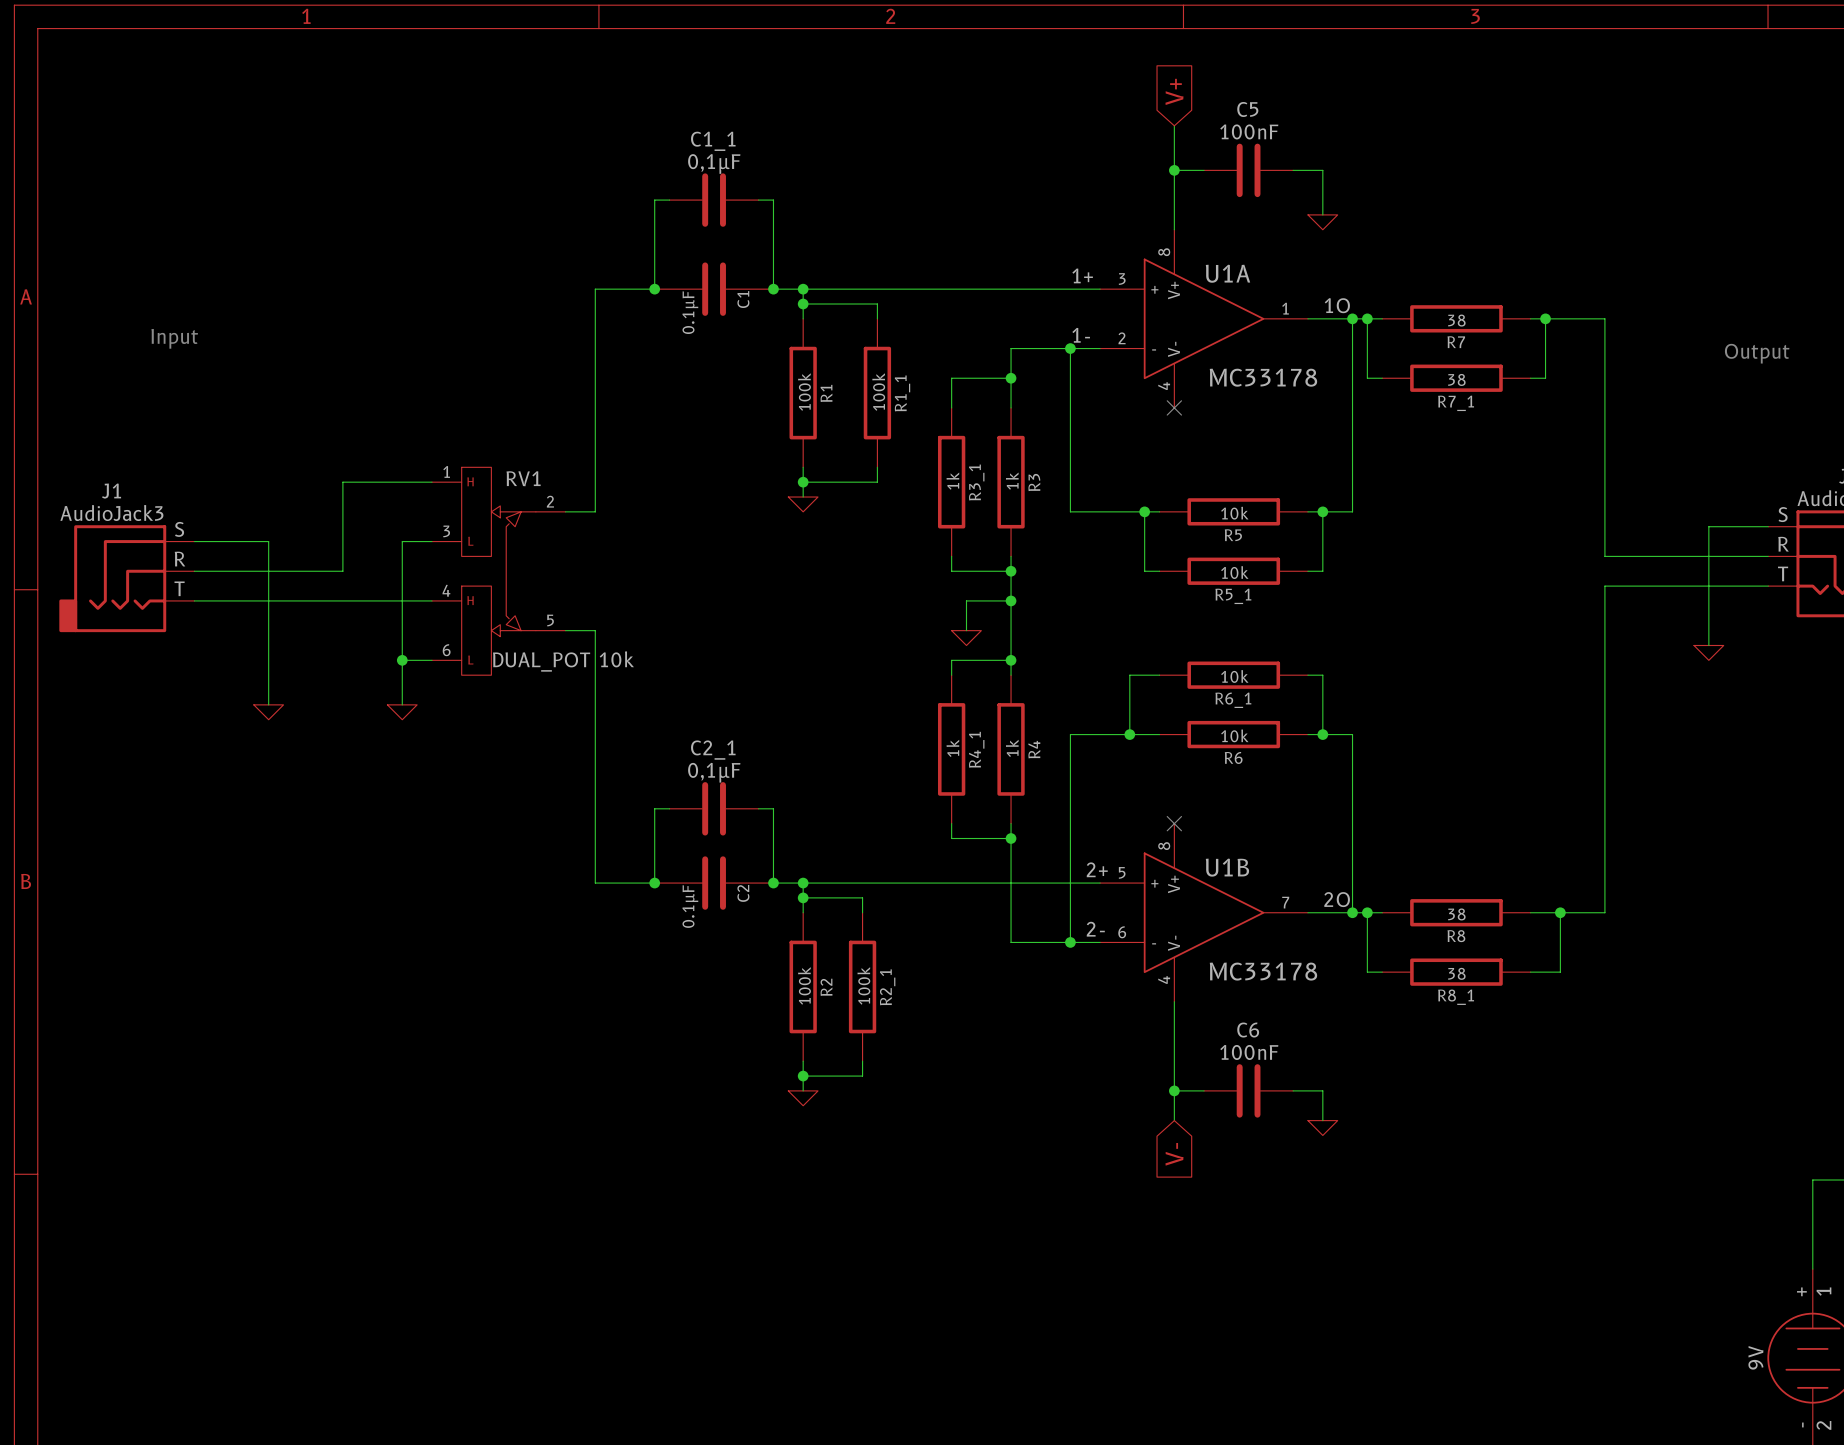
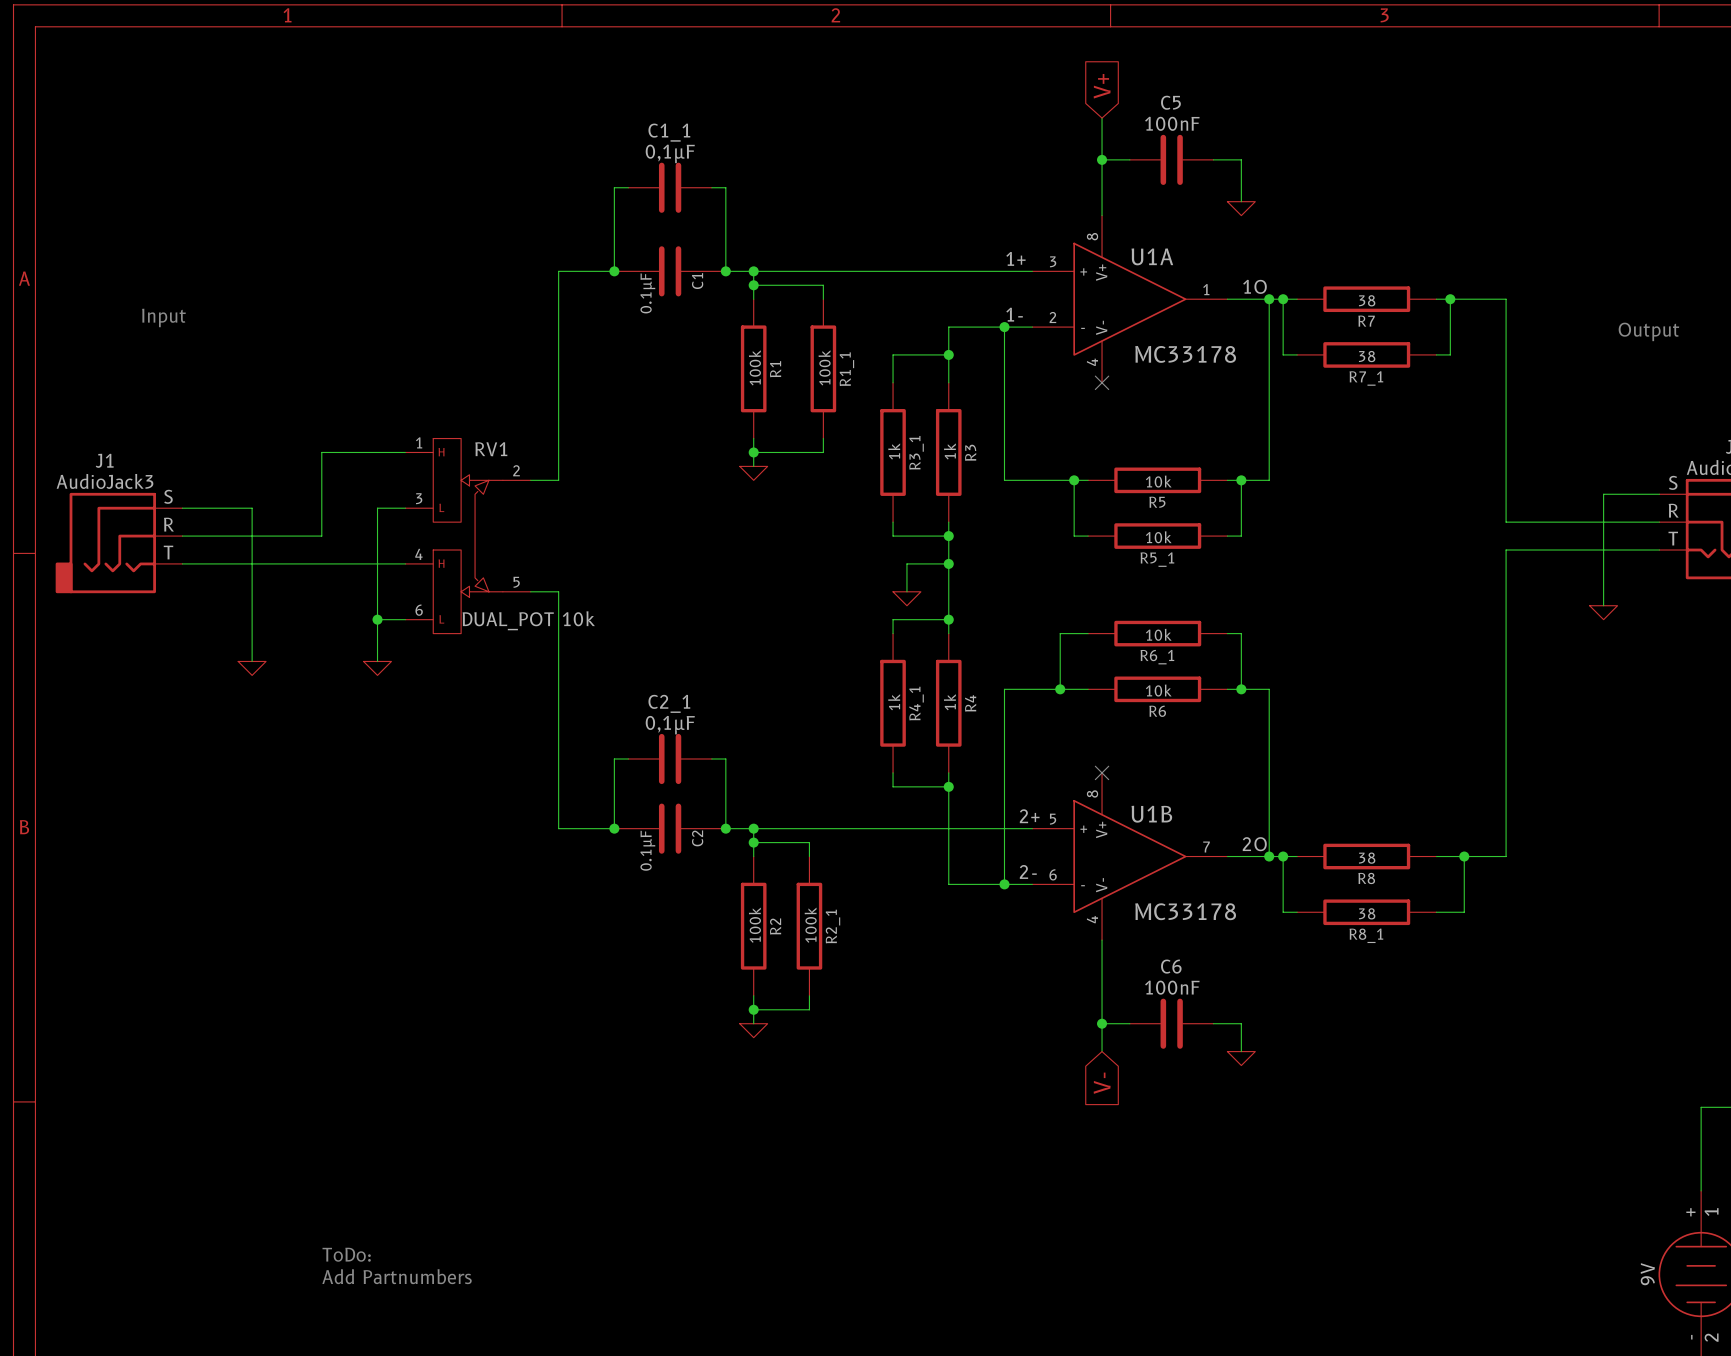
text: none -> ToDo: (346, 1254)
text: none -> Add Partnumbers (397, 1276)

